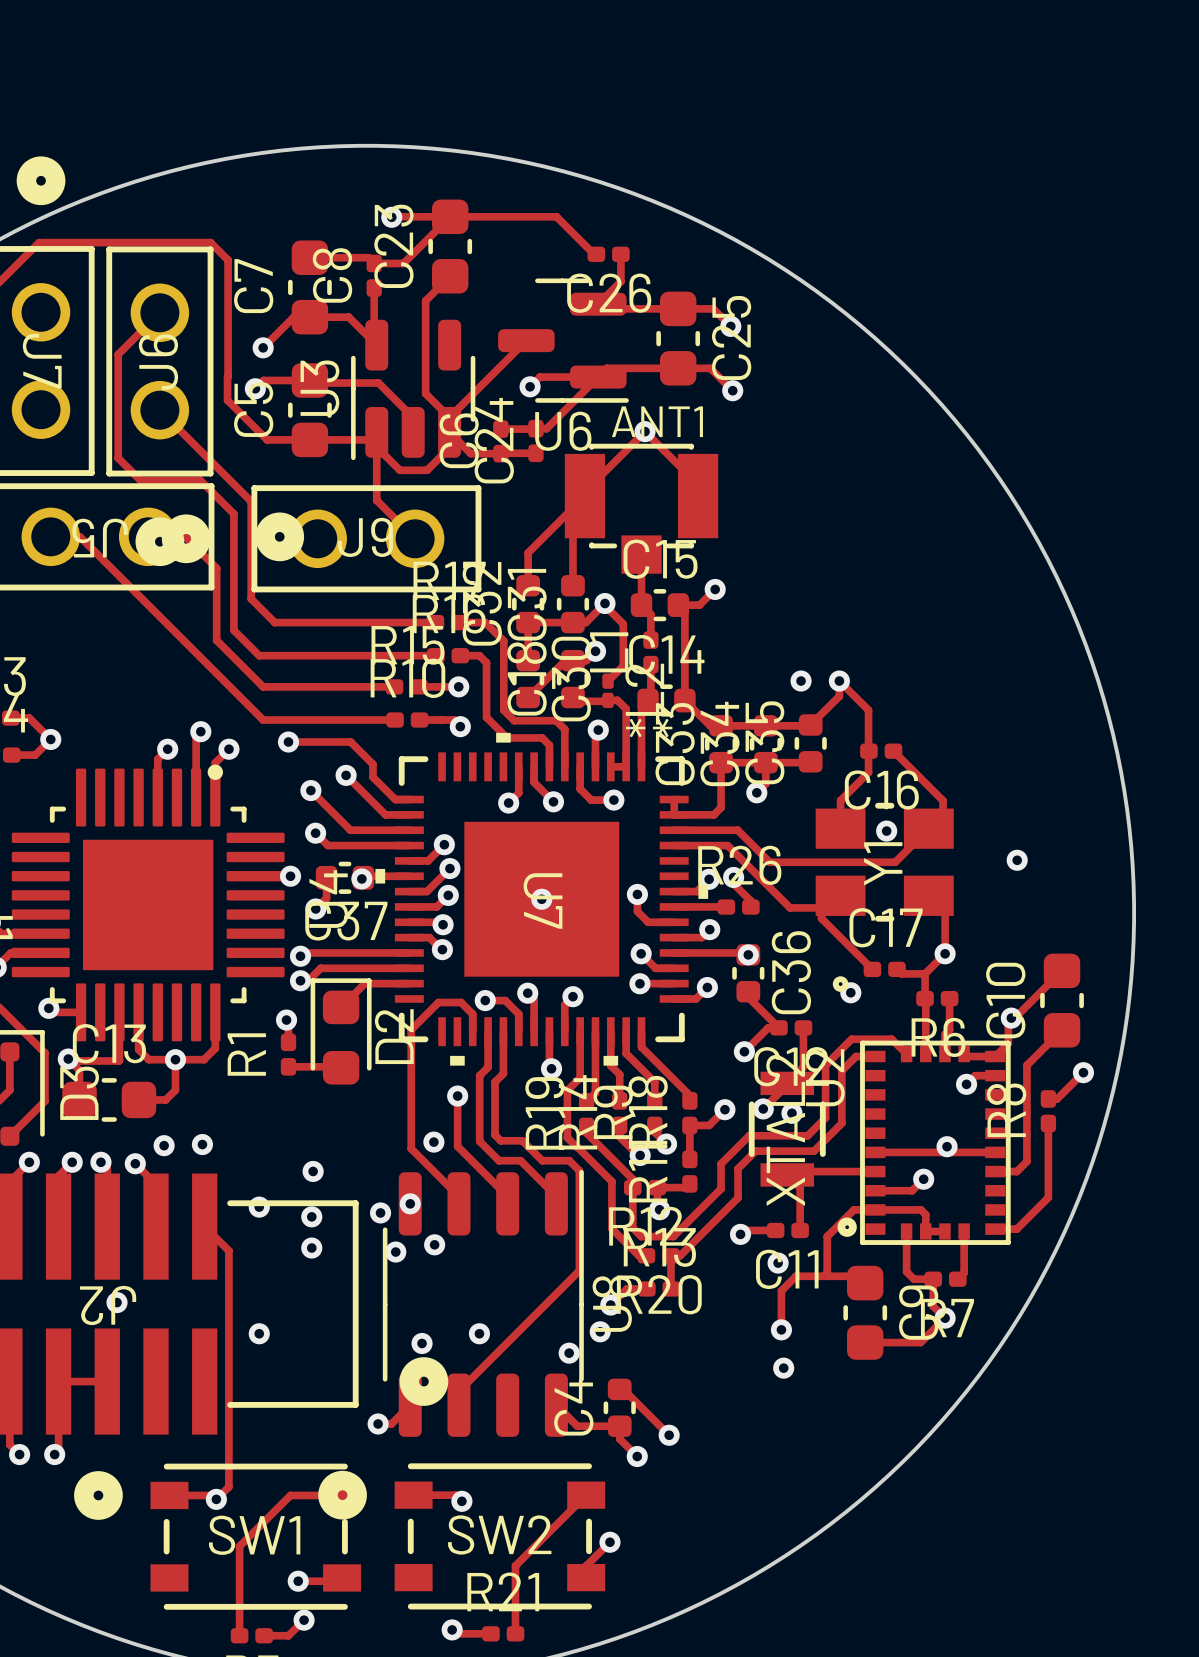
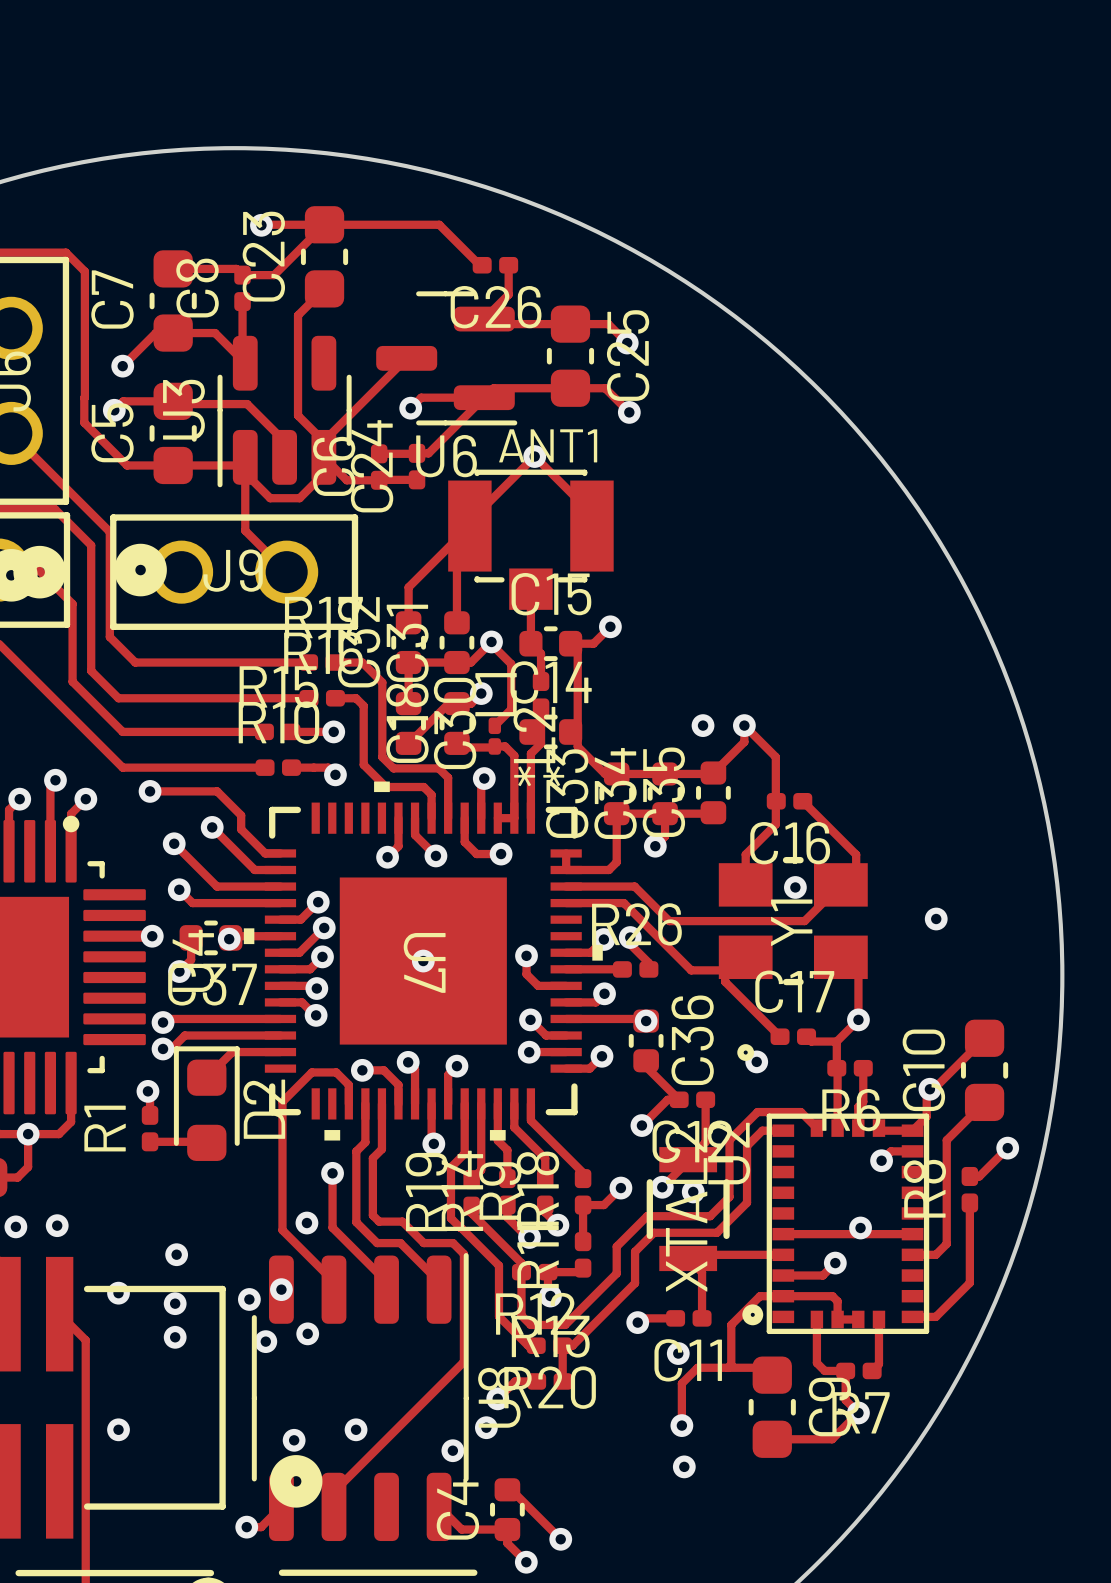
C14 position: (666, 700) -> (550, 731)

